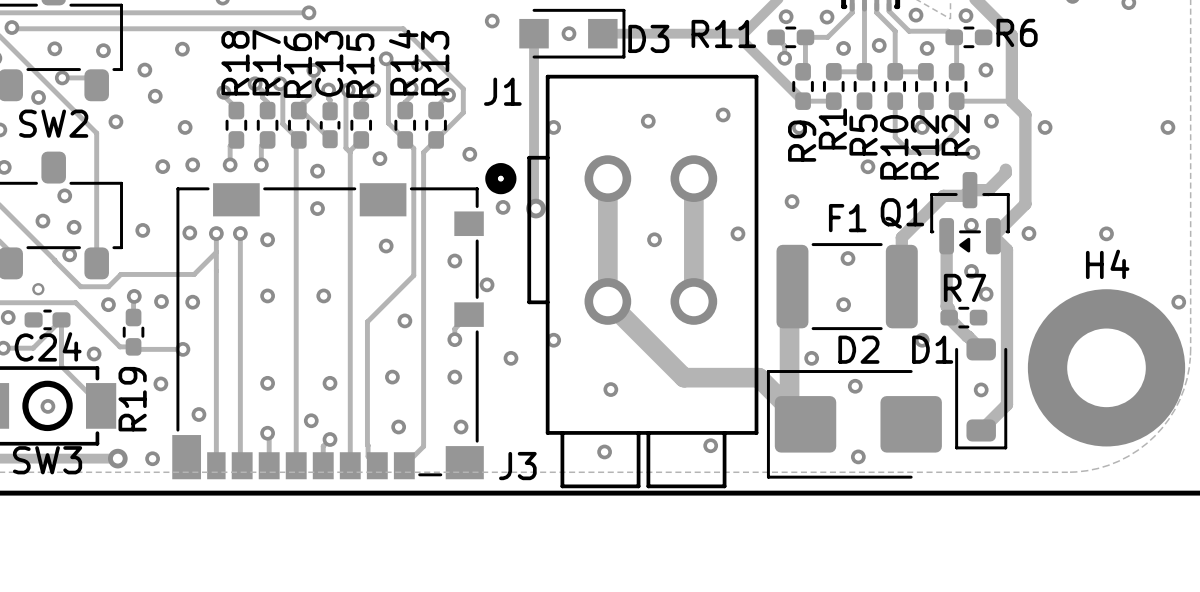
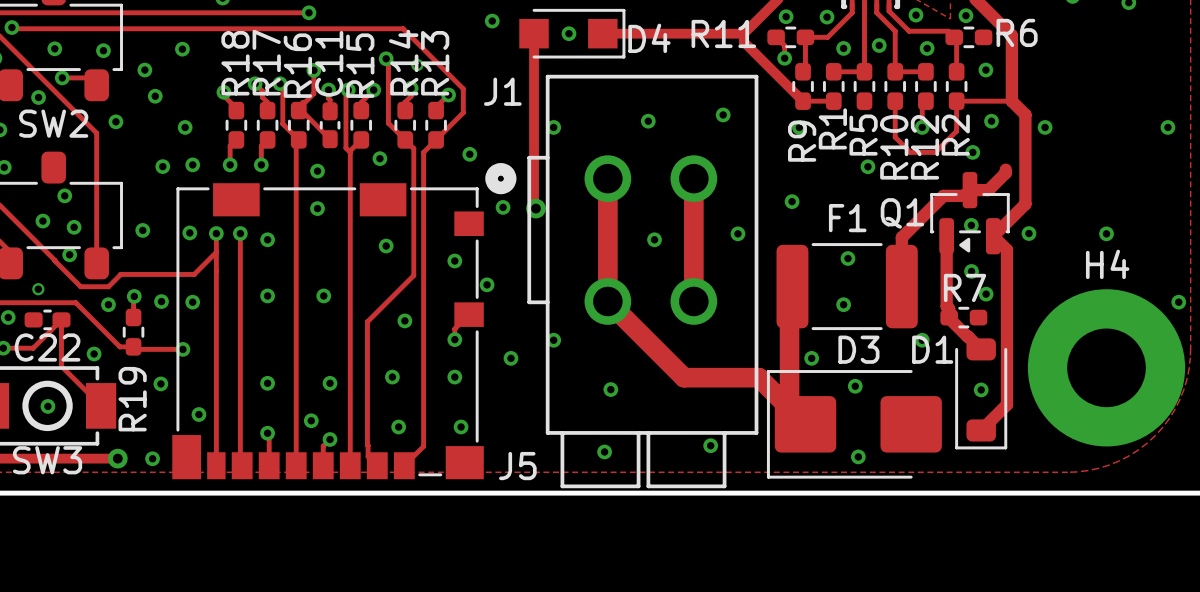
D3 name: D3 (648, 38) -> D4 (649, 38)
C13 name: C13 (329, 63) -> C11 (329, 63)
C24 name: C24 (48, 346) -> C22 (47, 347)
D2 name: D2 (858, 349) -> D3 (858, 349)
J3 name: J3 (517, 466) -> J5 (517, 466)

